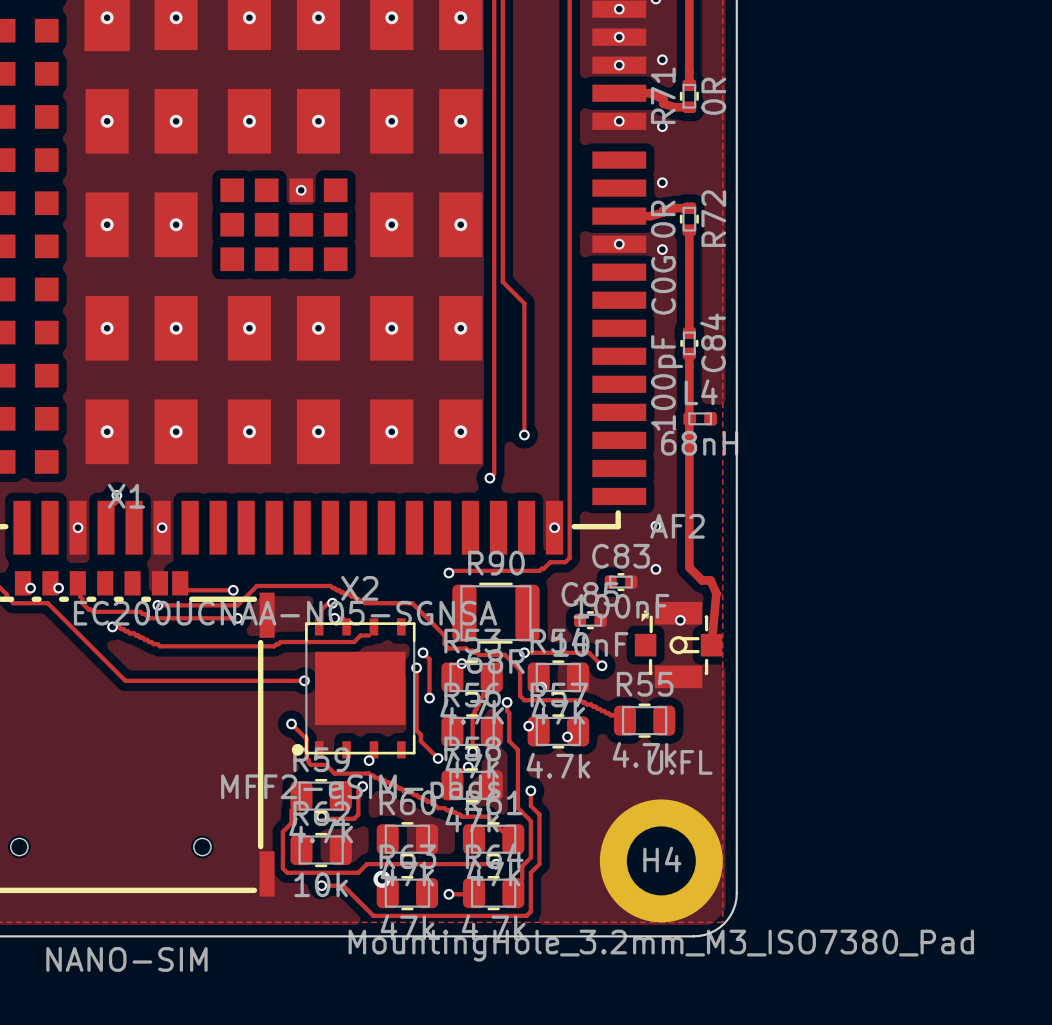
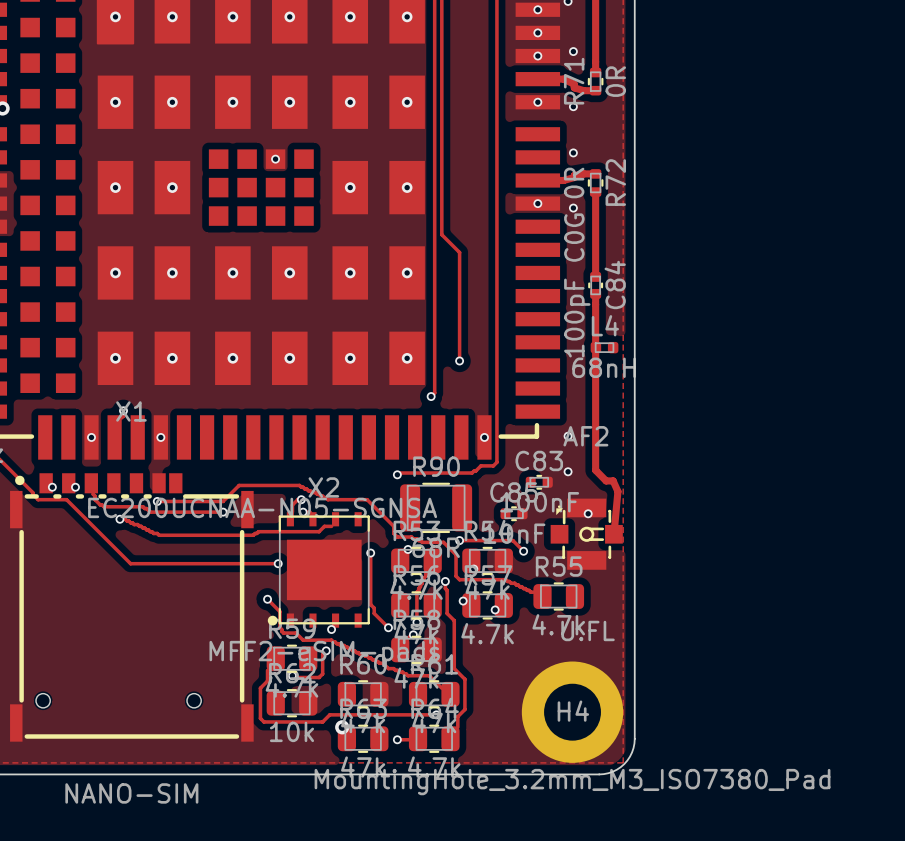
track: (188, 590) (233, 590) -> none
via: (233, 590) -> none
track: (423, 652) (429, 659) (429, 698) -> none
via: (423, 652) -> none
via: (429, 698) -> none
track: (530, 790) (530, 805) (539, 814) (539, 864) (530, 872) (530, 911) (526, 915) (373, 915) (343, 885) (321, 885) -> none
via: (530, 790) -> none
via: (321, 885) -> none

